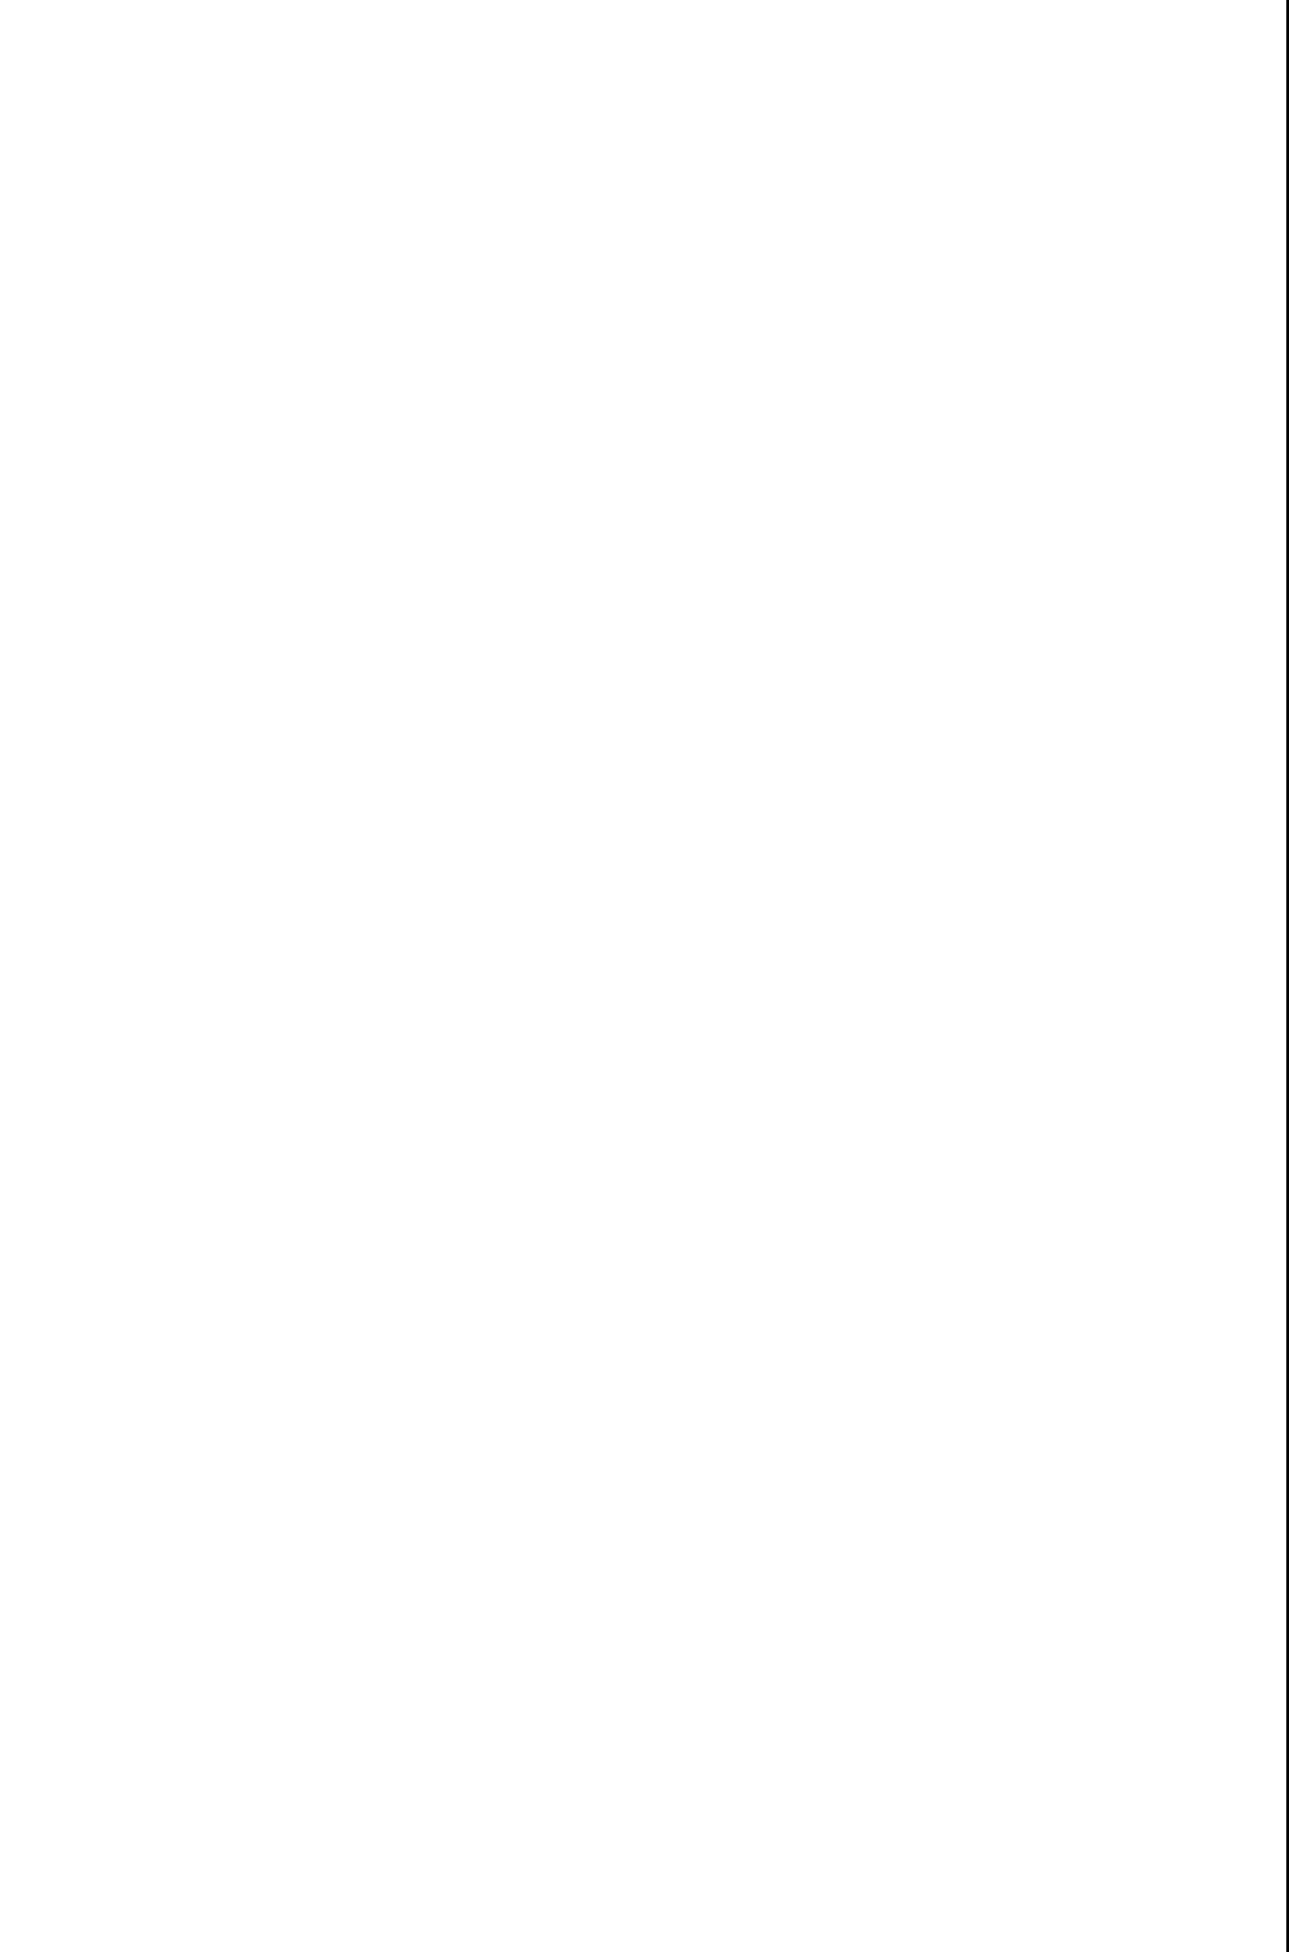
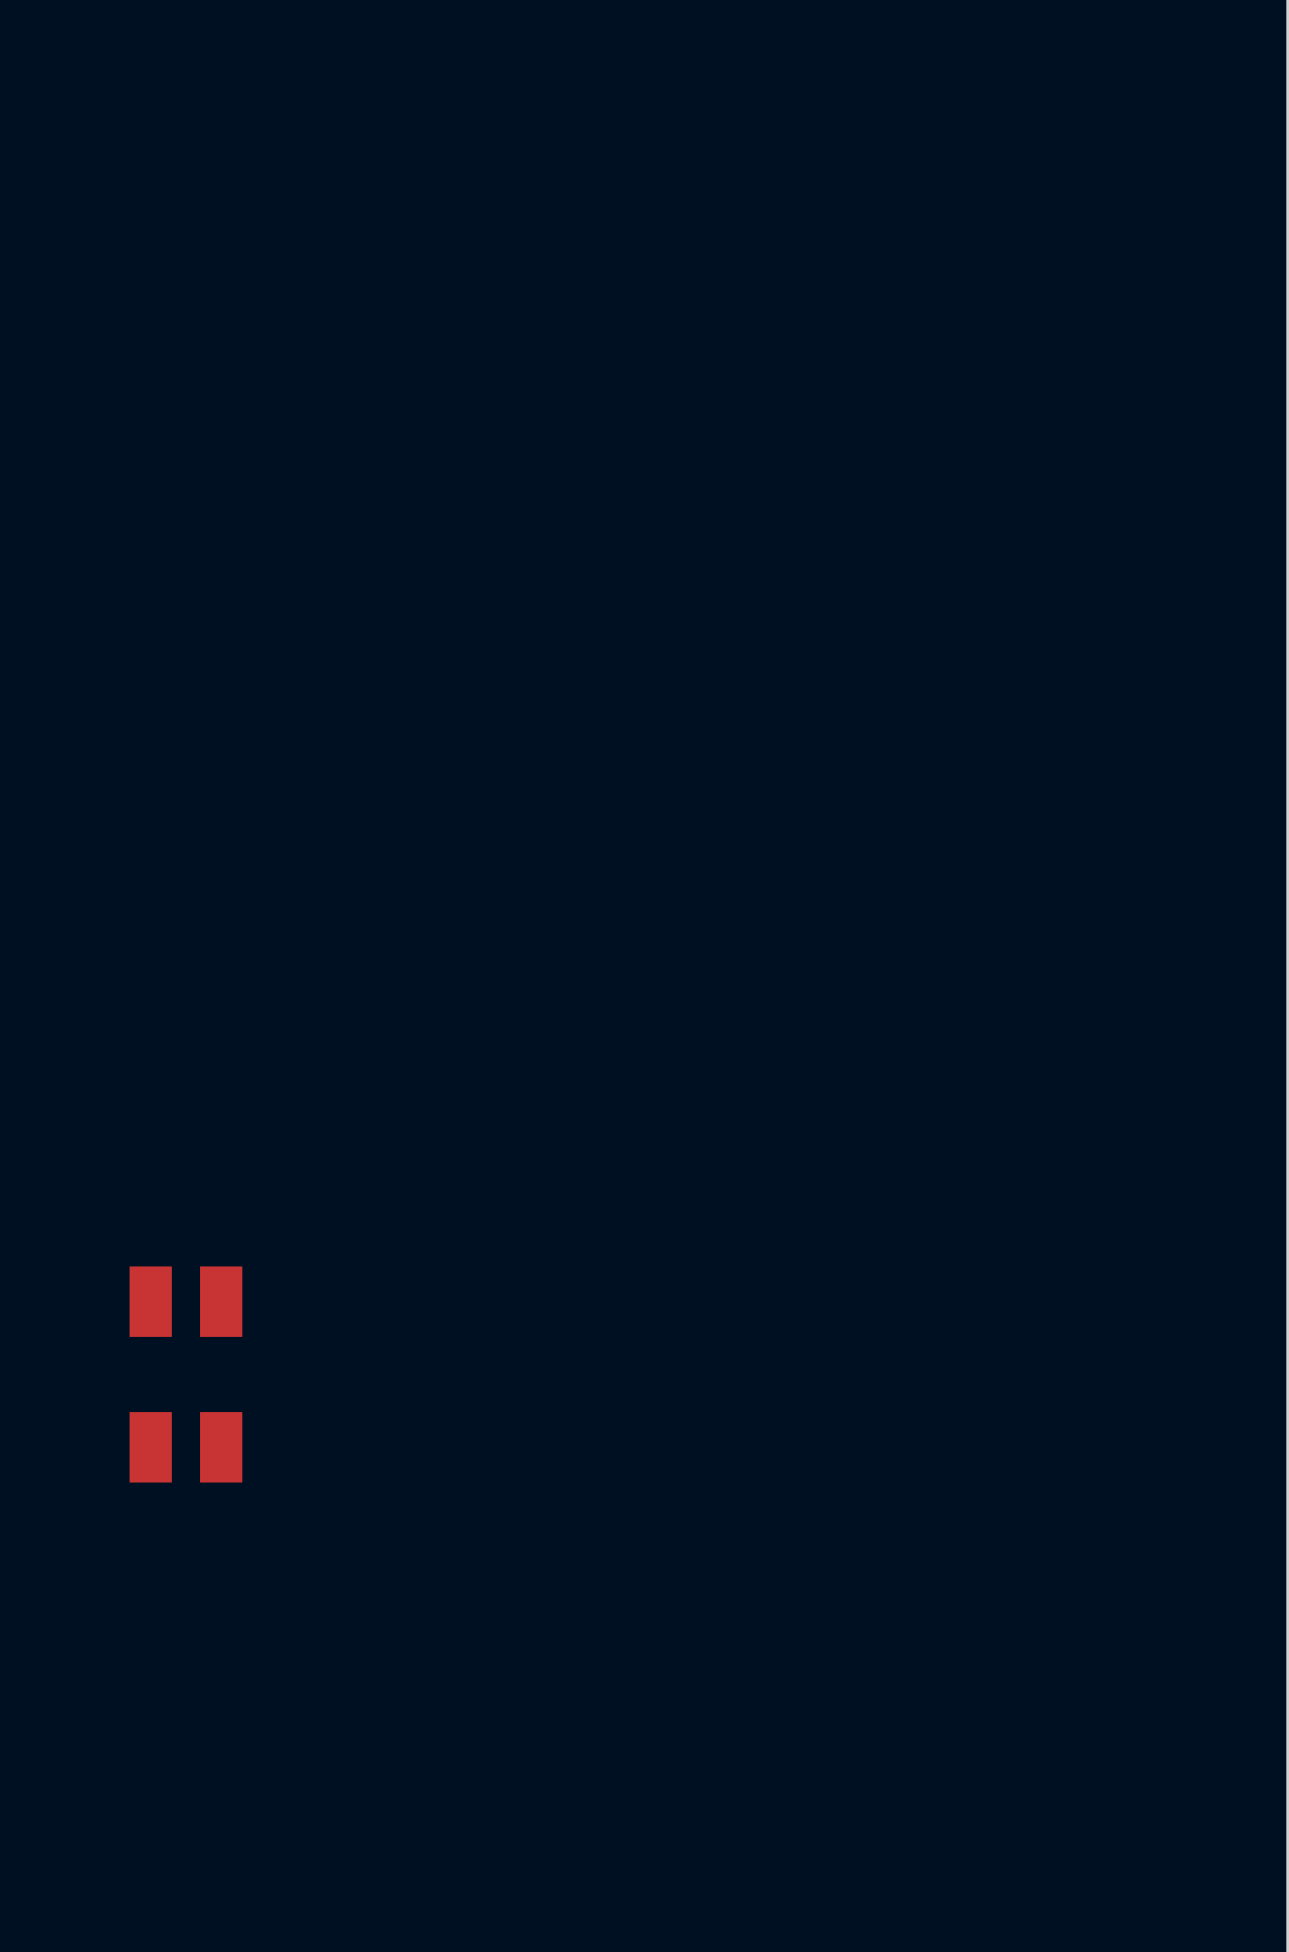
part: none -> (185, 1374)

